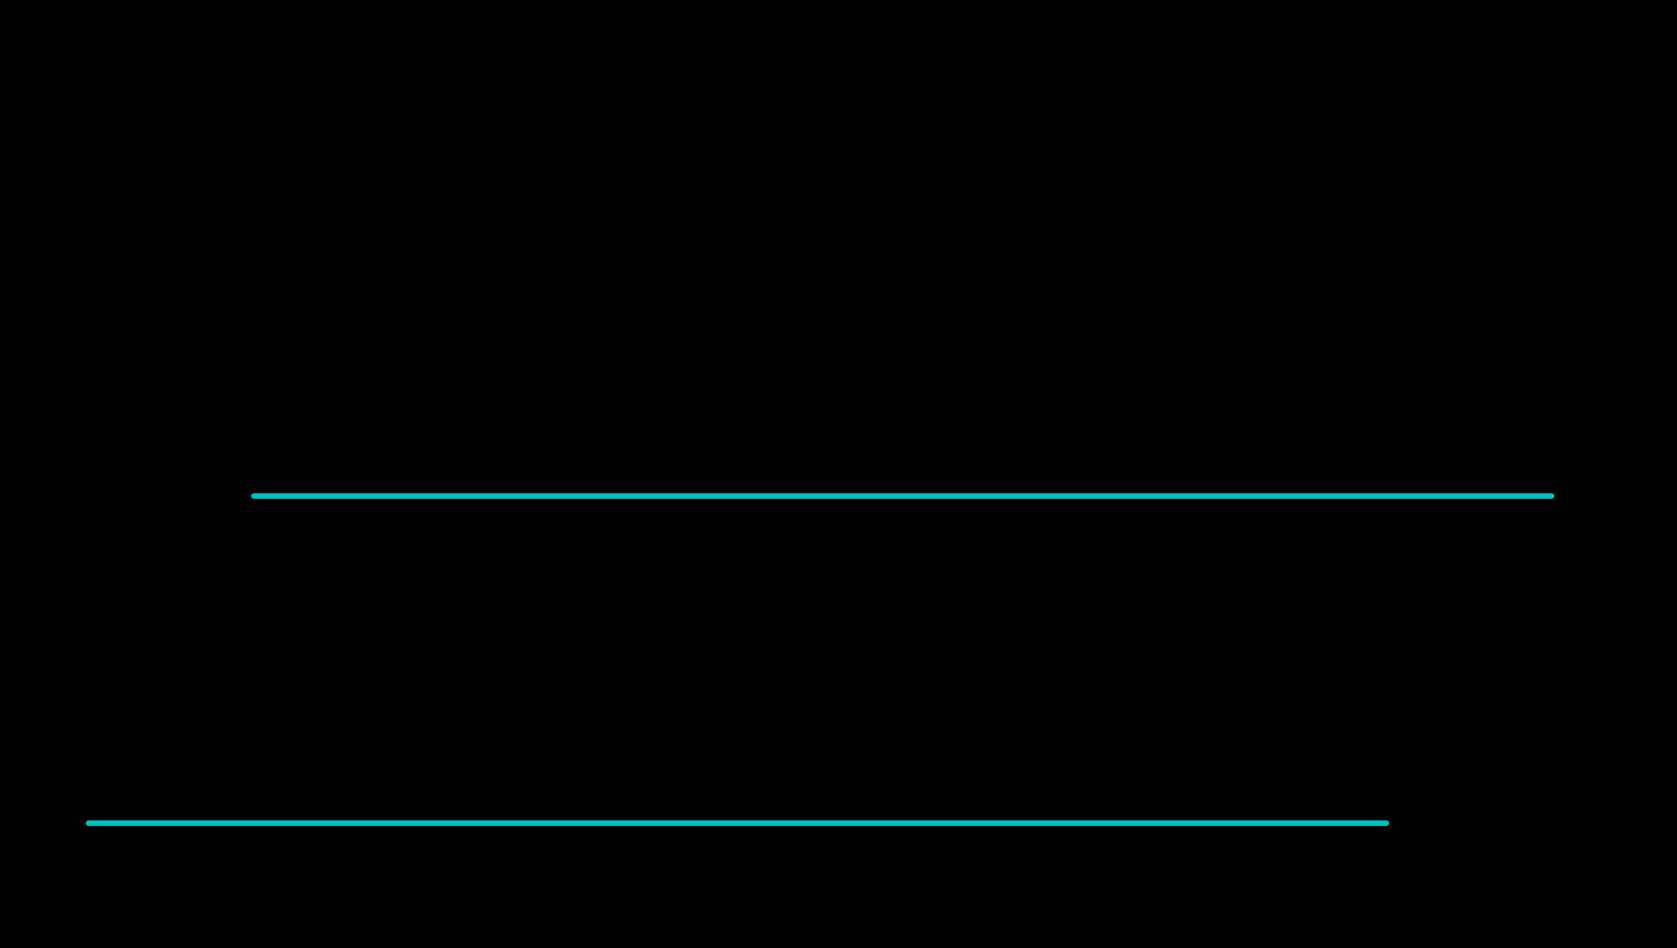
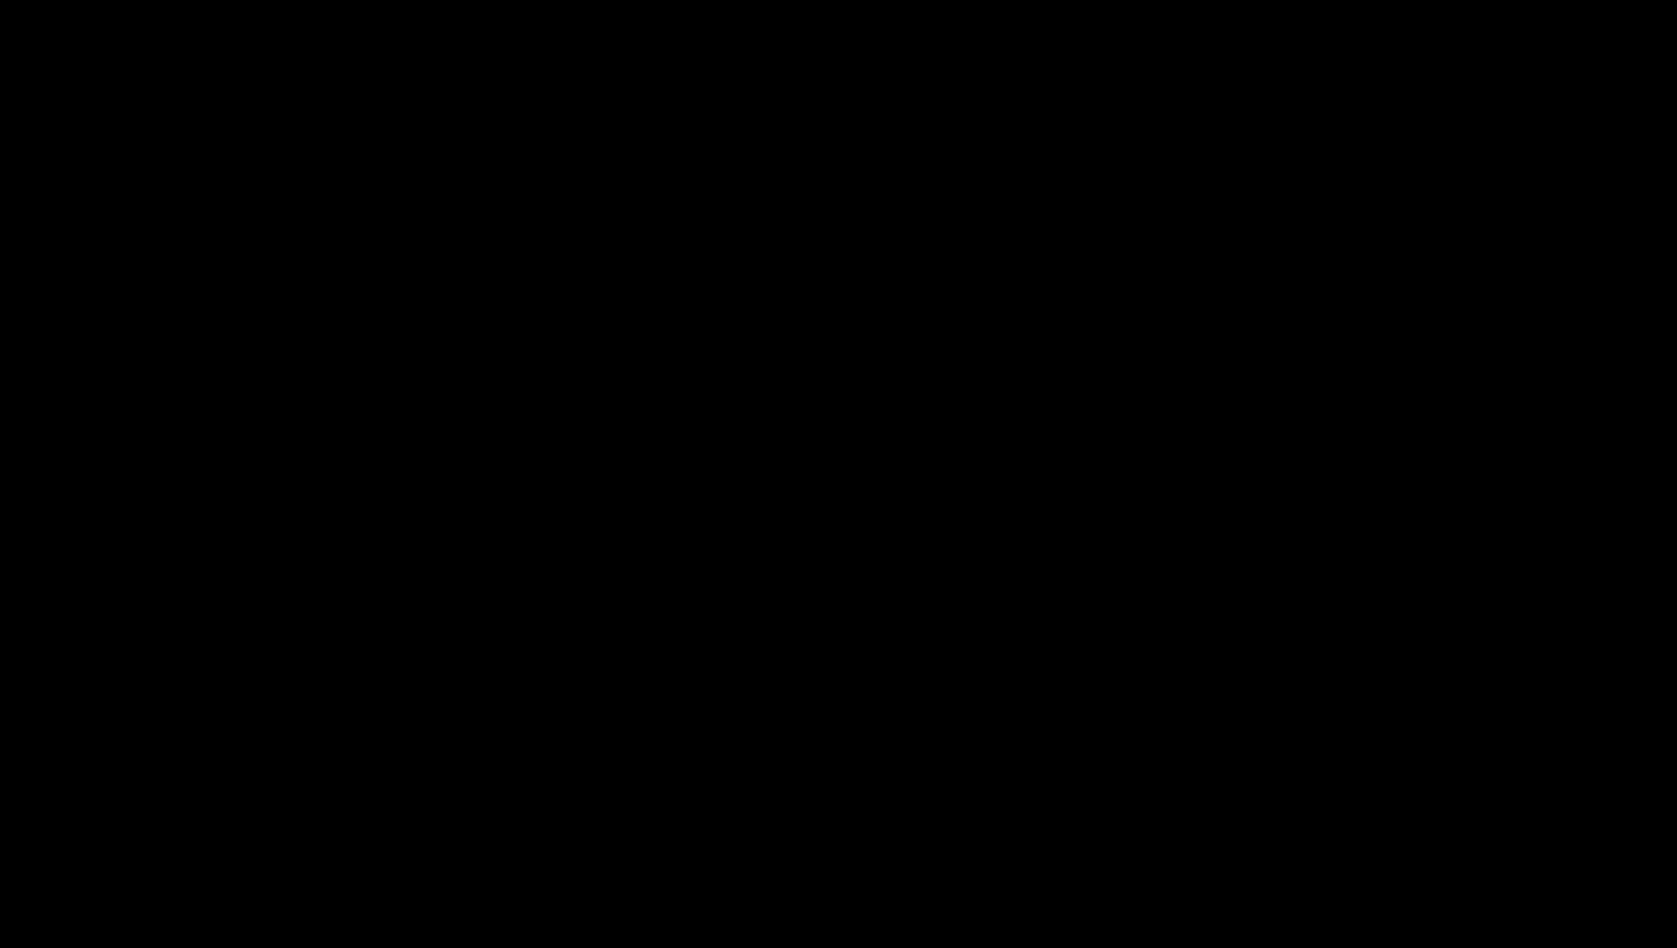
line: (253, 496) (1551, 496) -> none
line: (88, 823) (1386, 823) -> none

